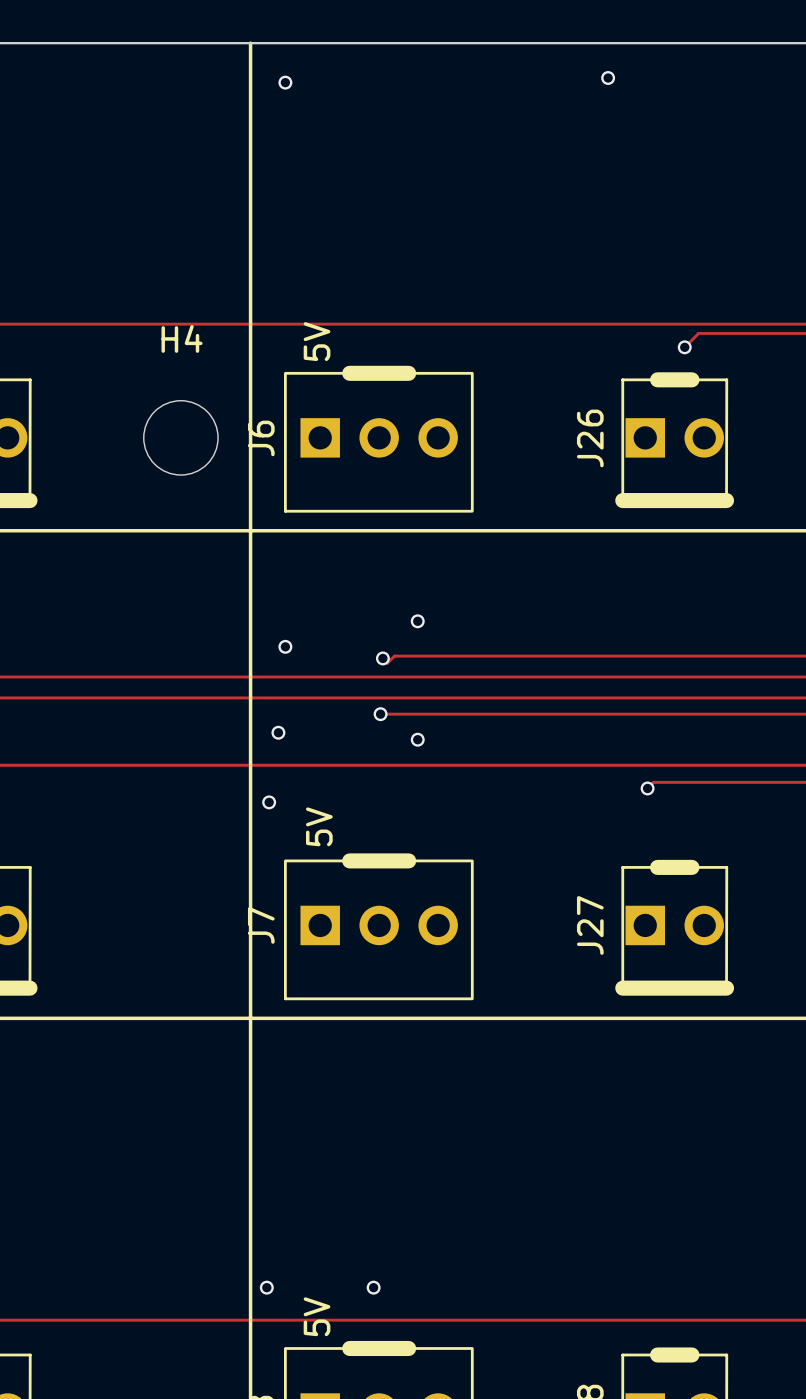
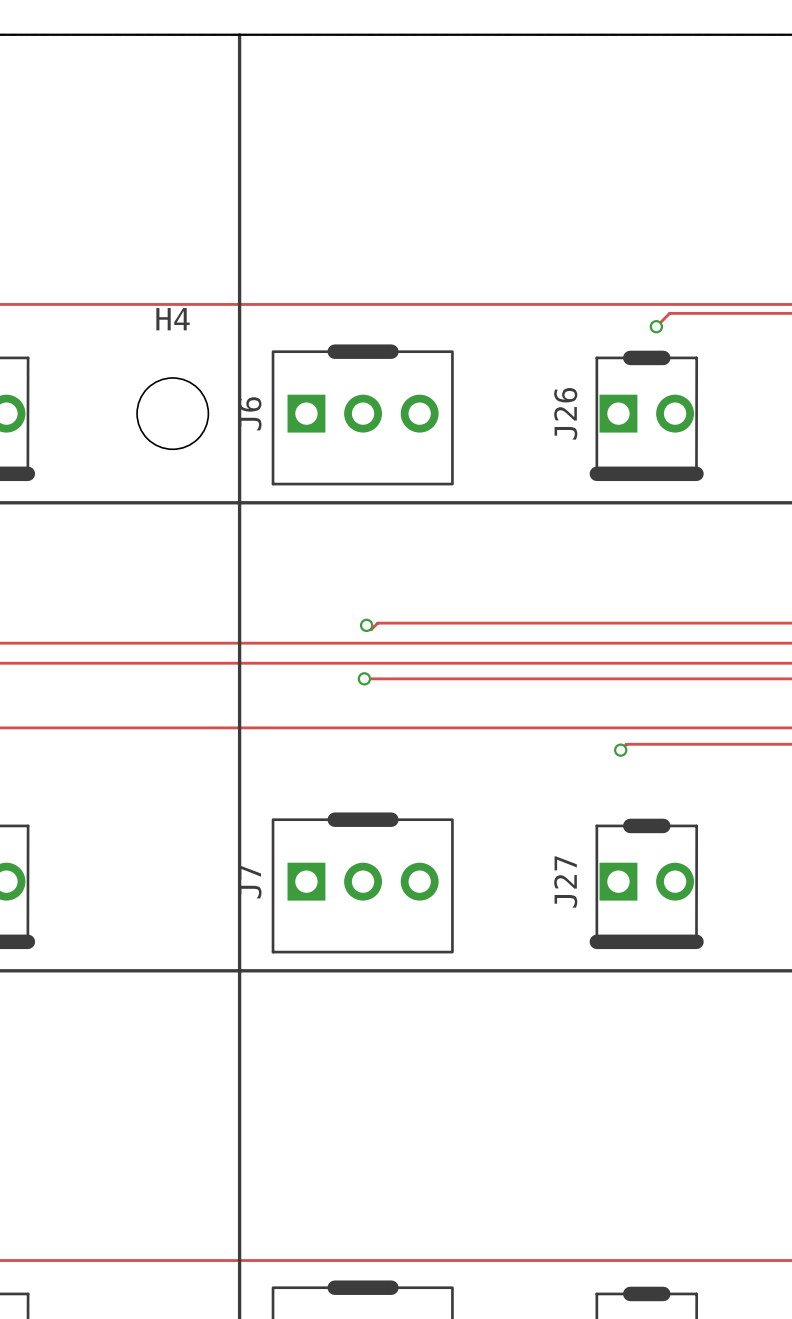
via: (608, 77) -> none
via: (285, 82) -> none
text: 5V (317, 341) -> none
via: (417, 621) -> none
via: (285, 646) -> none
via: (278, 732) -> none
via: (417, 739) -> none
via: (269, 802) -> none
text: 5V (319, 826) -> none
via: (266, 1287) -> none
via: (373, 1287) -> none
text: 5V (317, 1316) -> none

